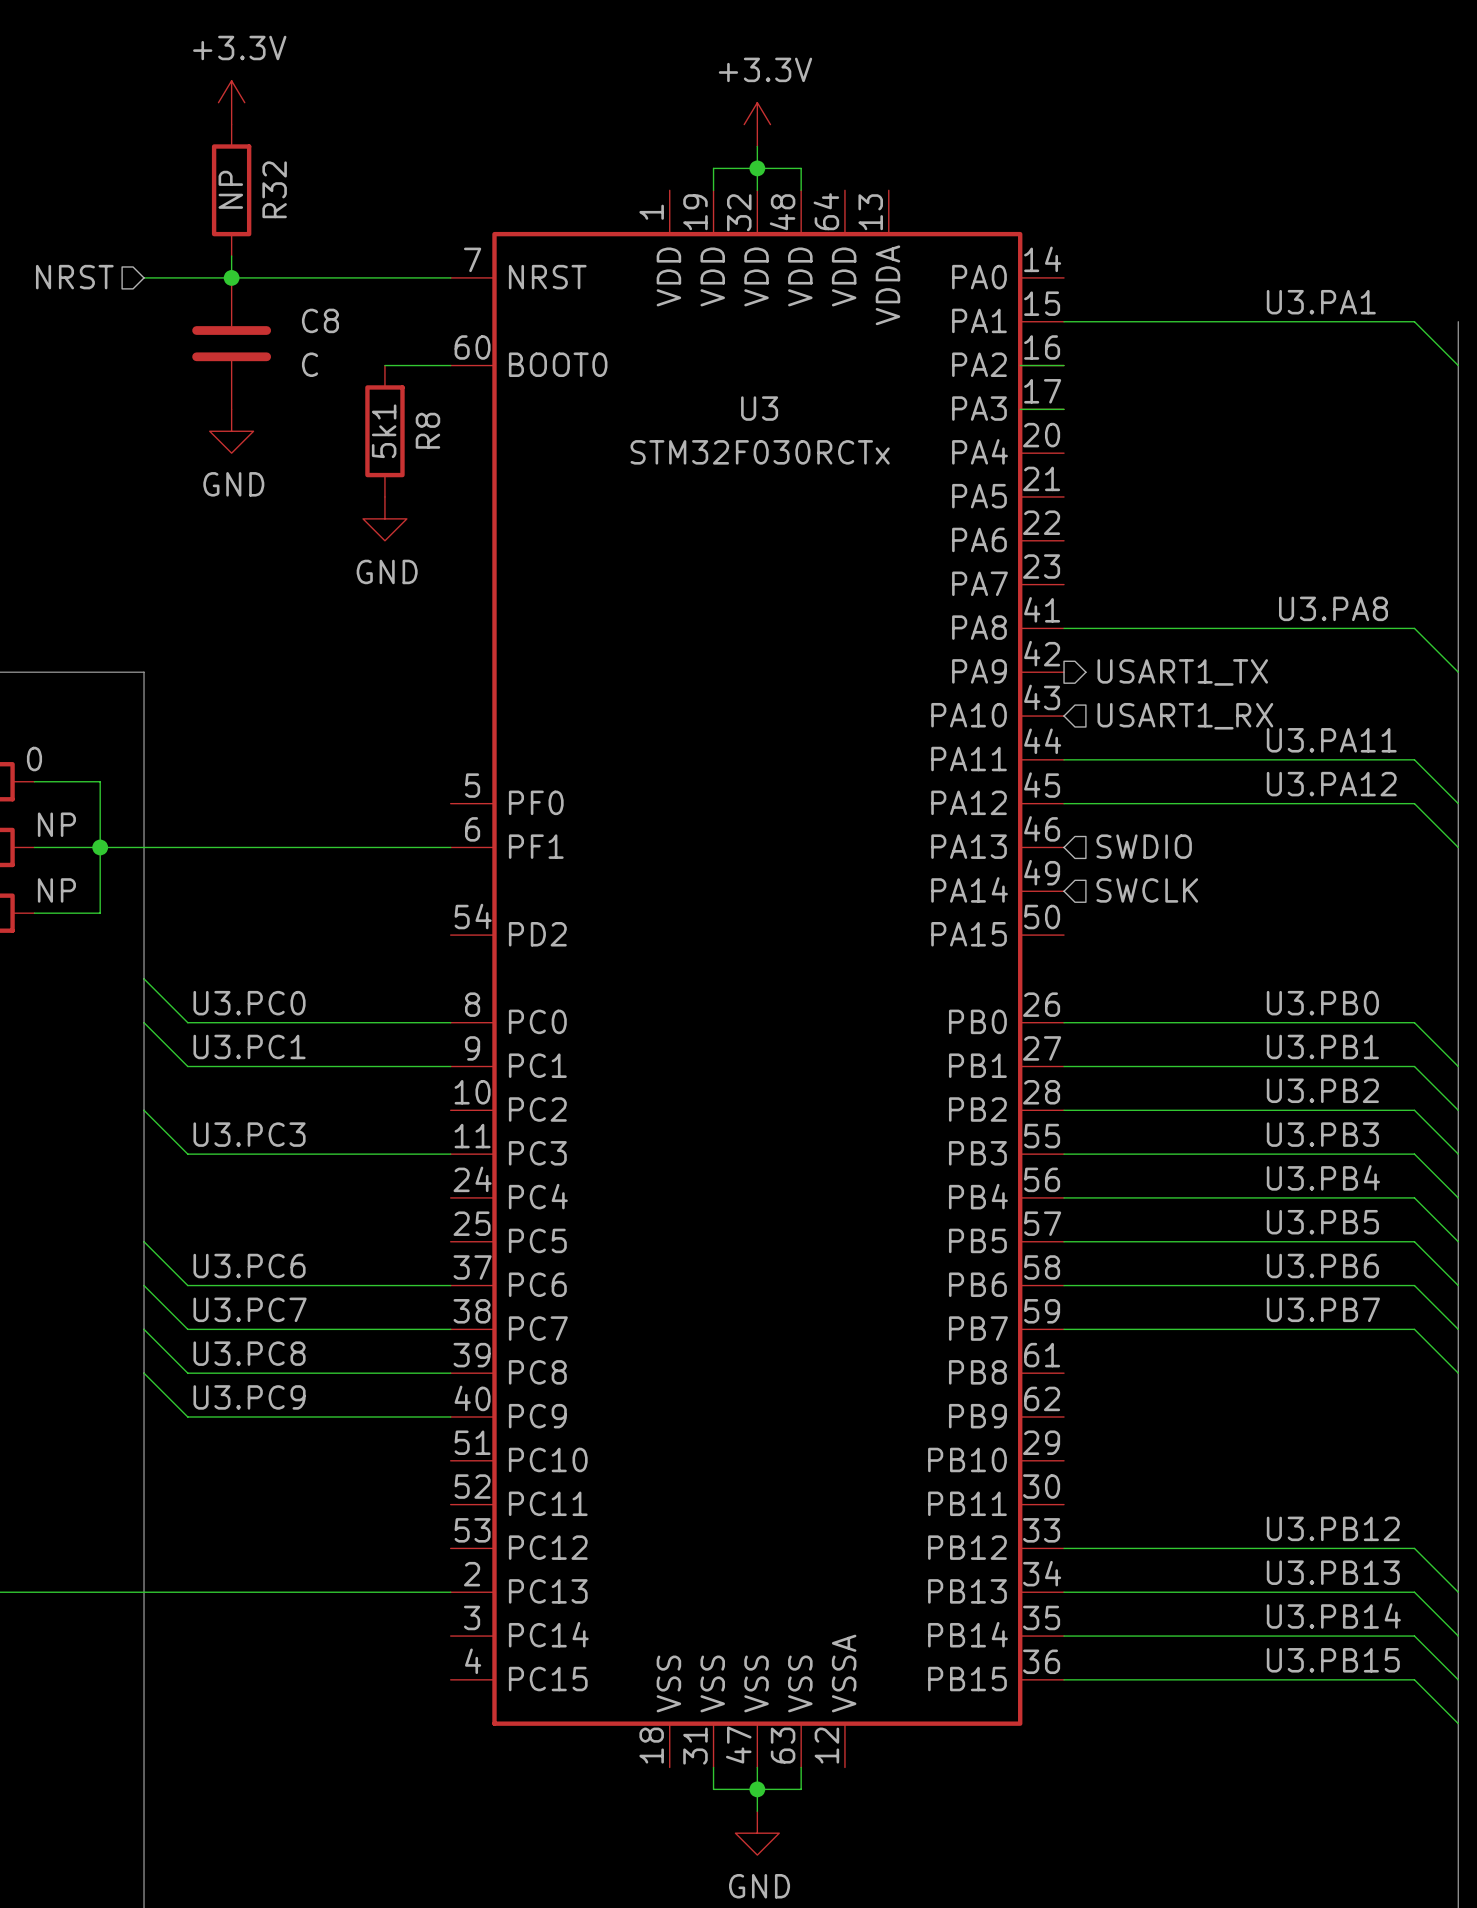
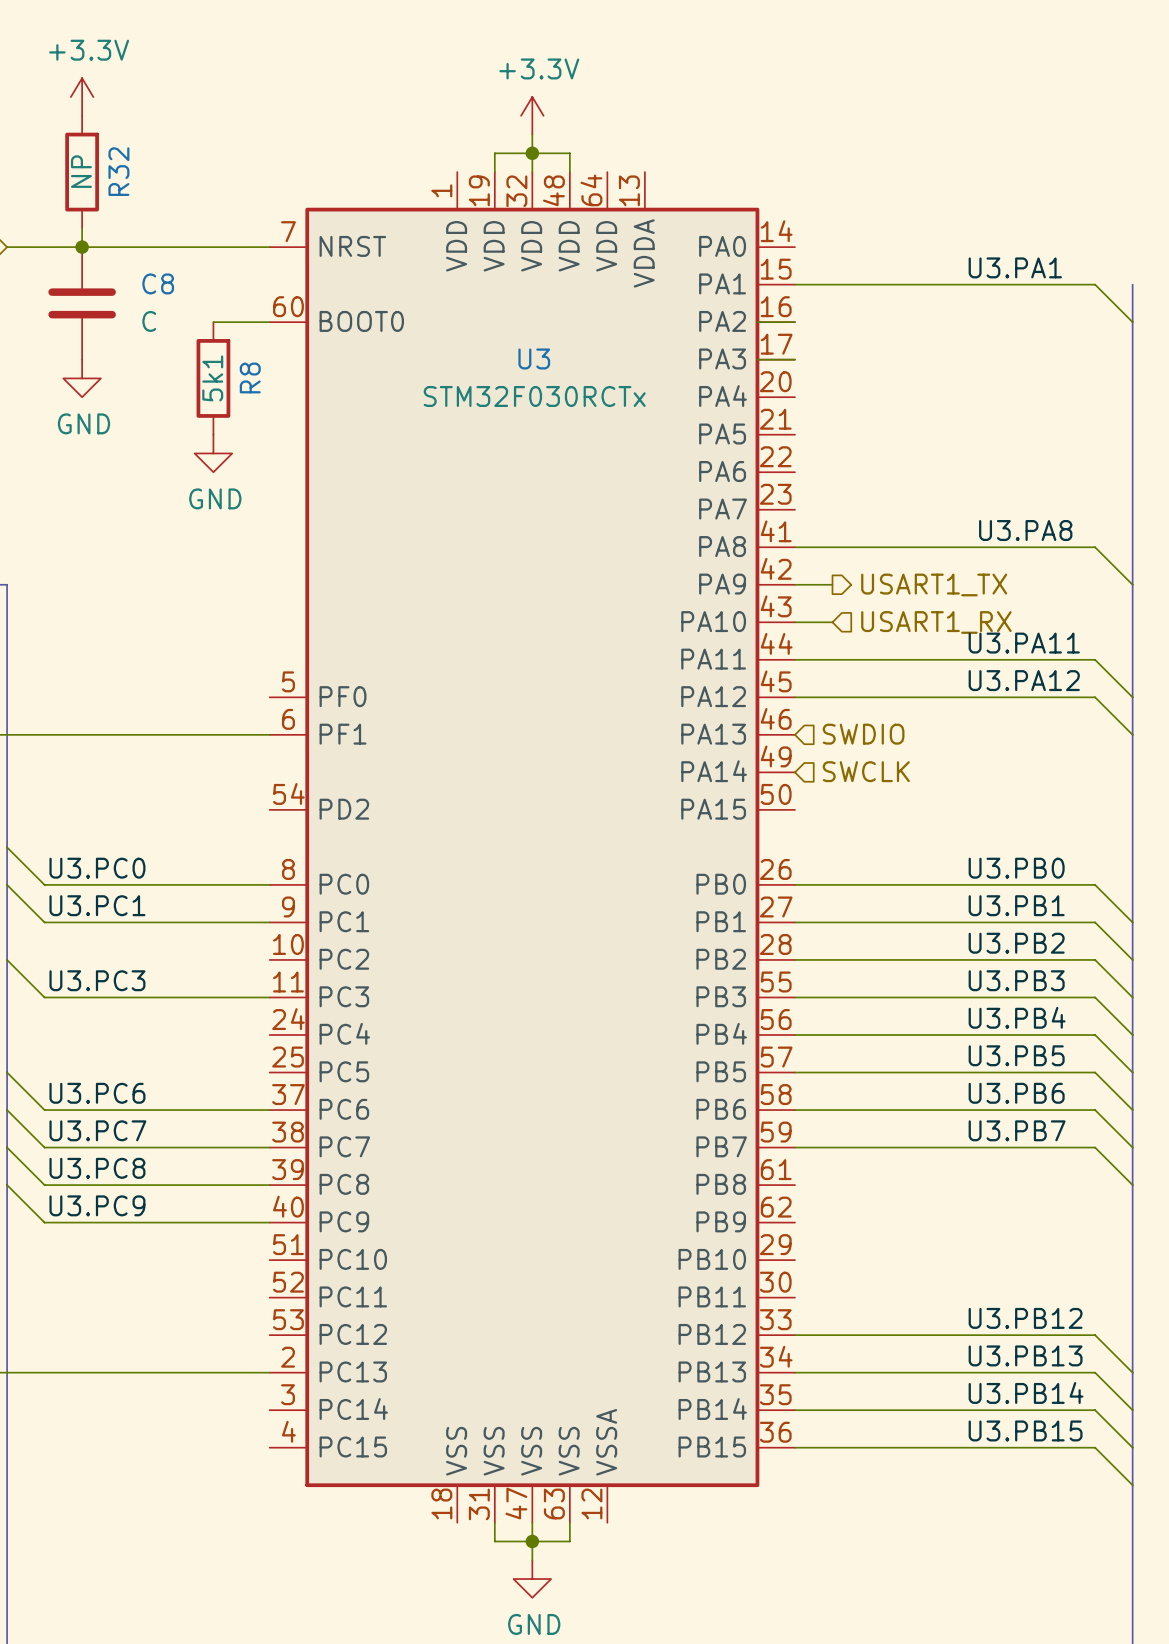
wire: none -> (794, 584) (832, 584)
hierarchical label position: USART1_TX (1182, 672) -> USART1_TX (934, 584)
wire: none -> (794, 622) (832, 622)
hierarchical label position: USART1_RX (1185, 716) -> USART1_RX (936, 622)

